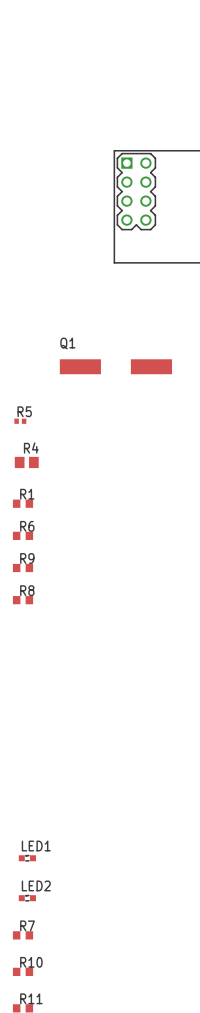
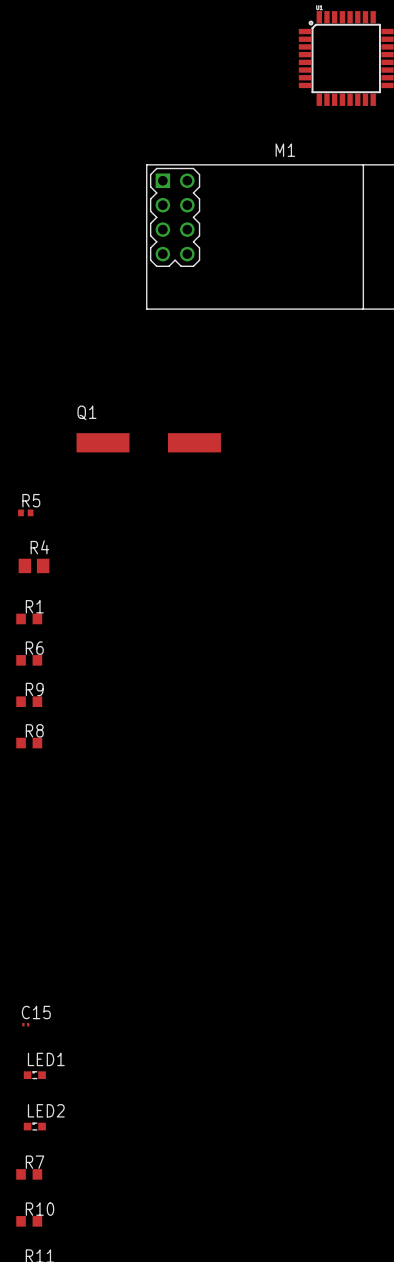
C15: none -> (25, 1024)

